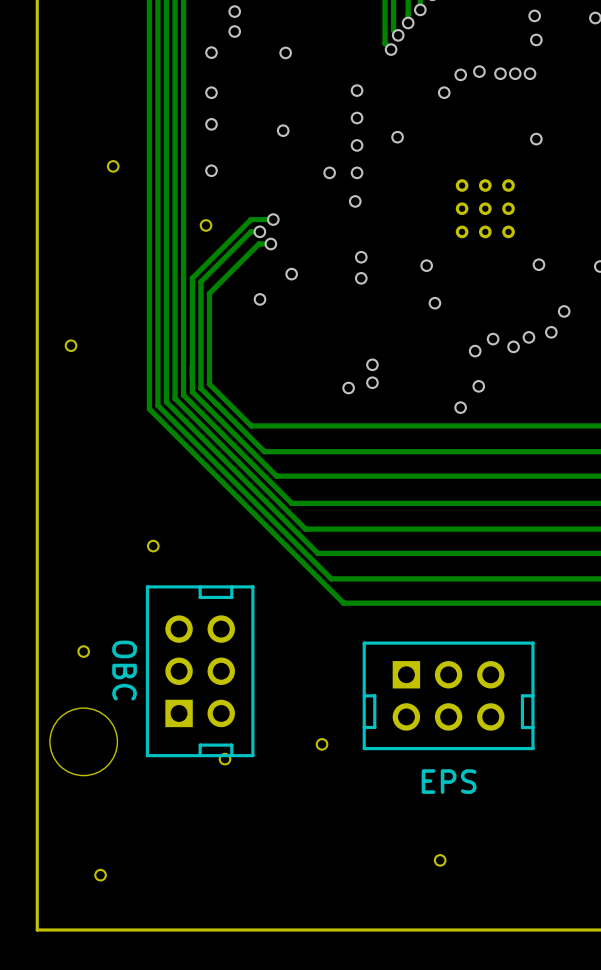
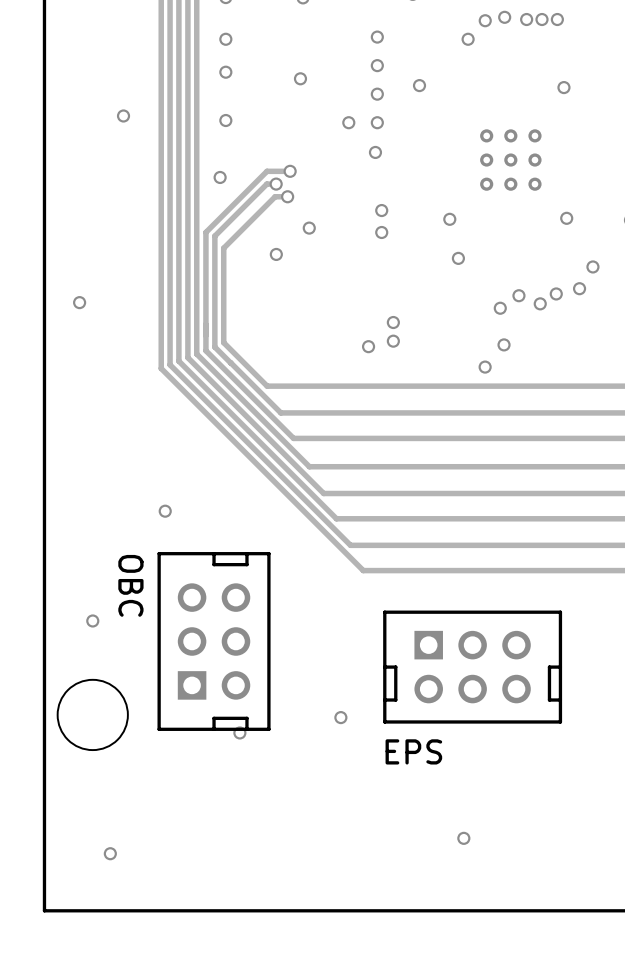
OBC name position: OBC (124, 670) -> OBC (130, 585)
EPS name position: EPS (449, 781) -> EPS (413, 751)

